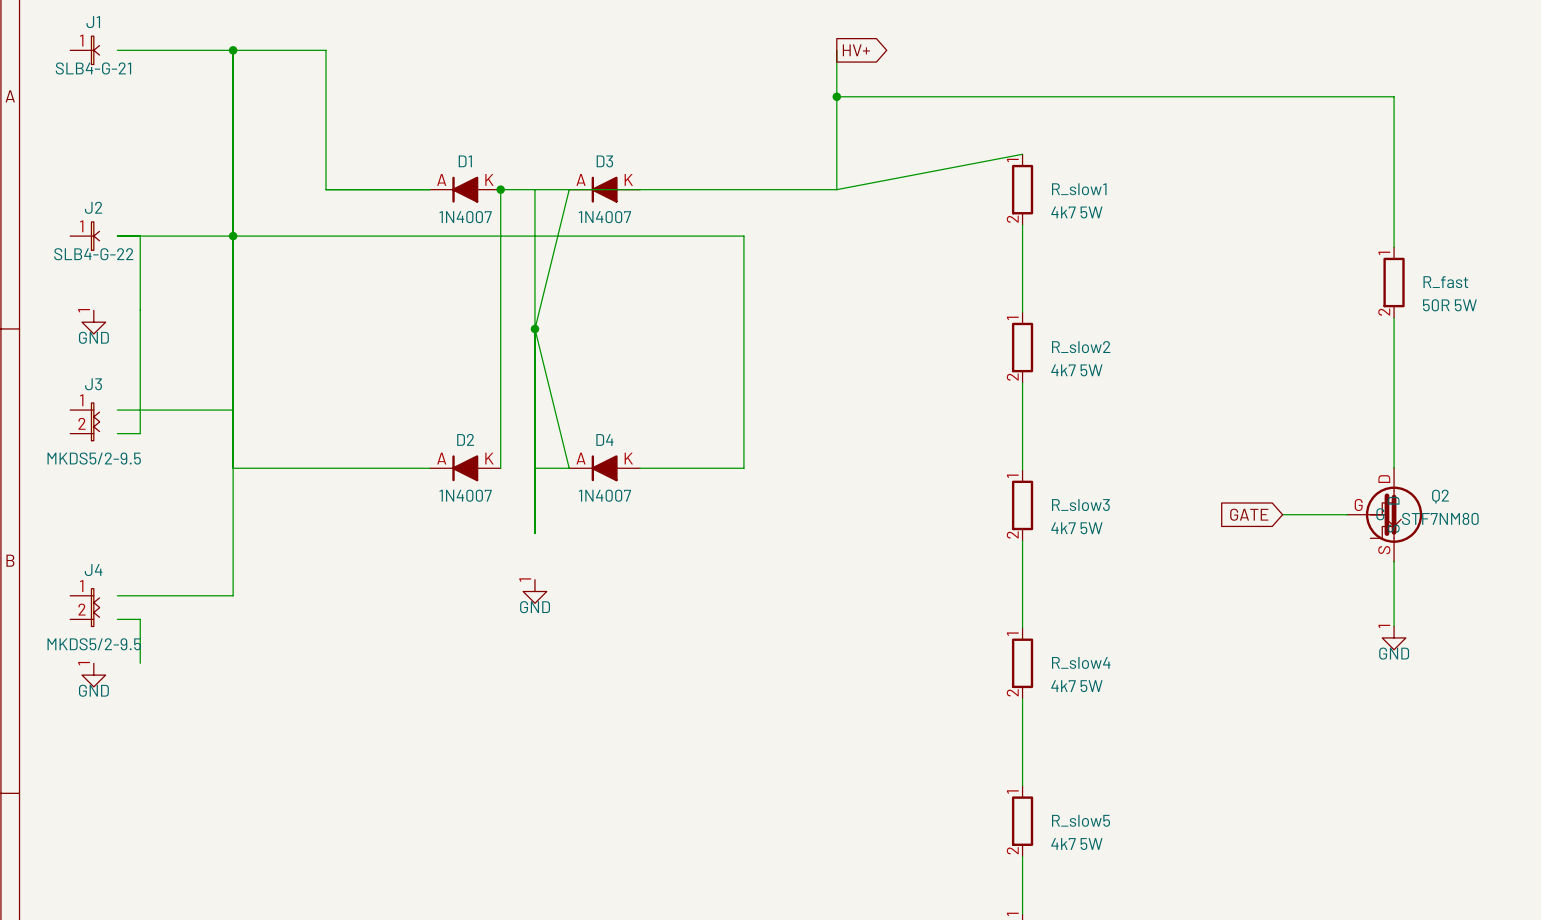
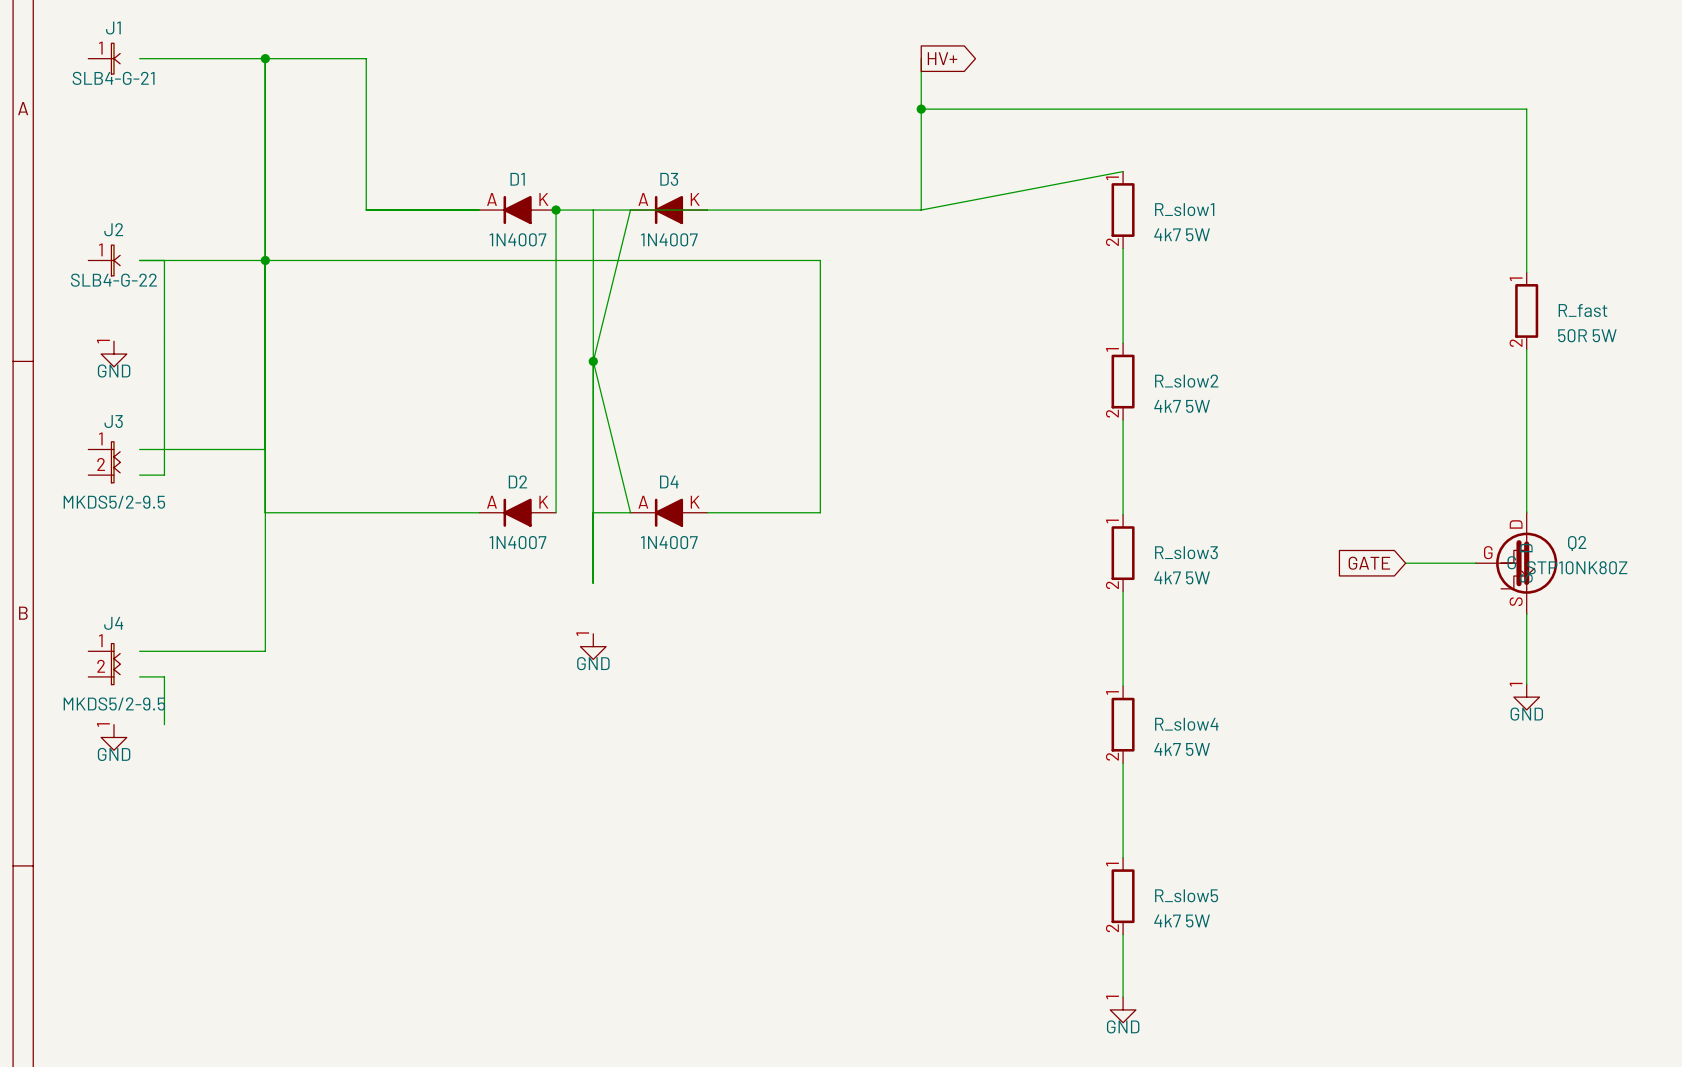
Q2 value: STF7NM80 (1440, 518) -> STP10NK80Z (1577, 567)

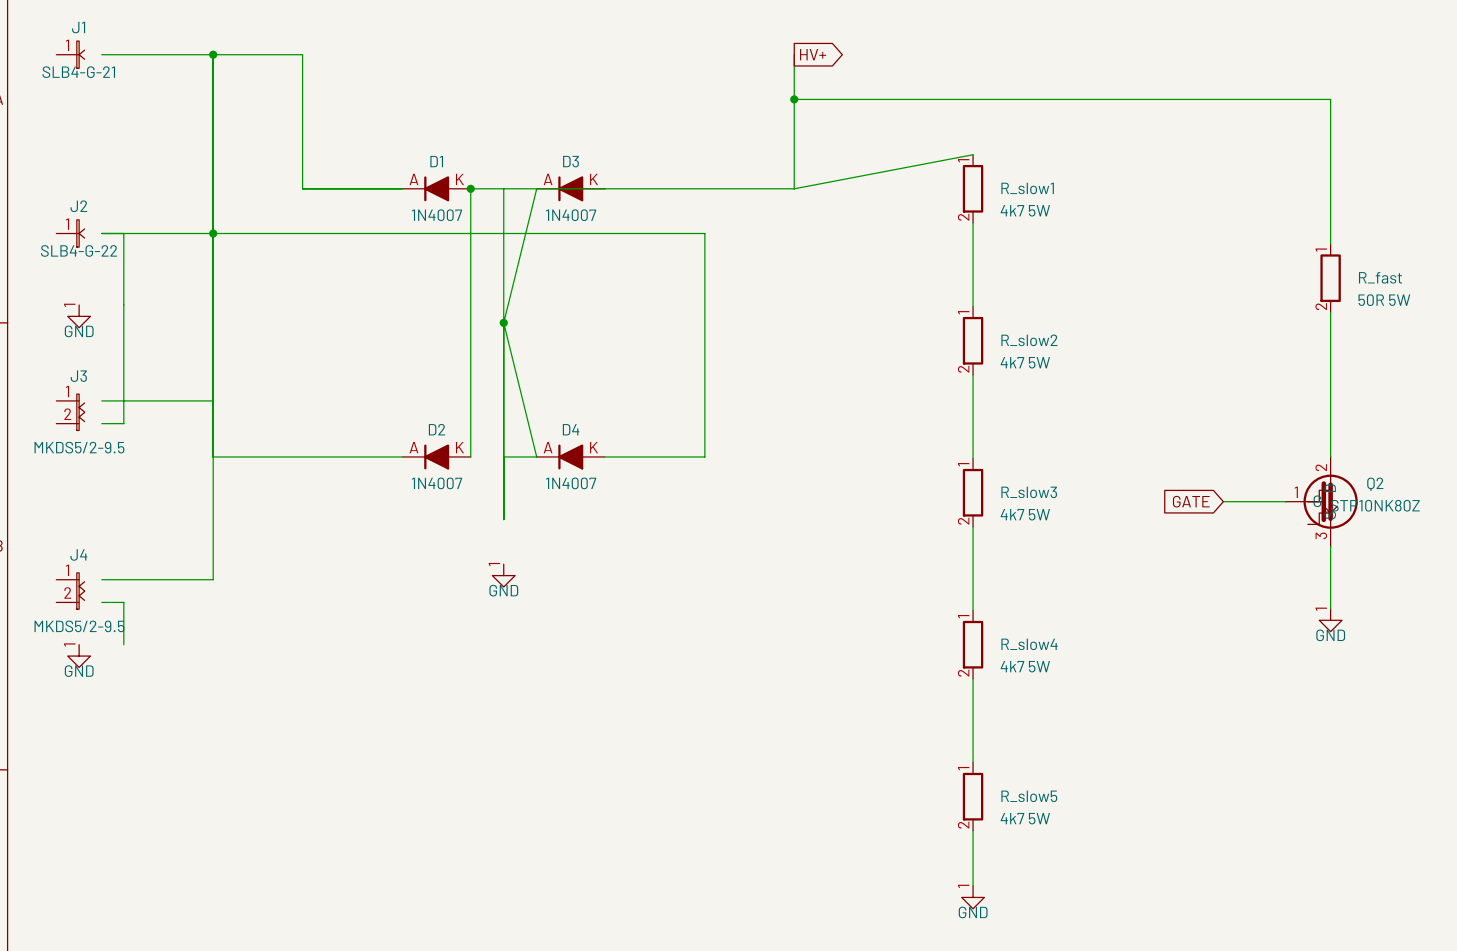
Q2 pin number: D (1516, 524) -> 2 (1321, 467)
Q2 pin number: G (1488, 552) -> 1 (1296, 492)
Q2 pin number: S (1516, 601) -> 3 (1321, 535)

